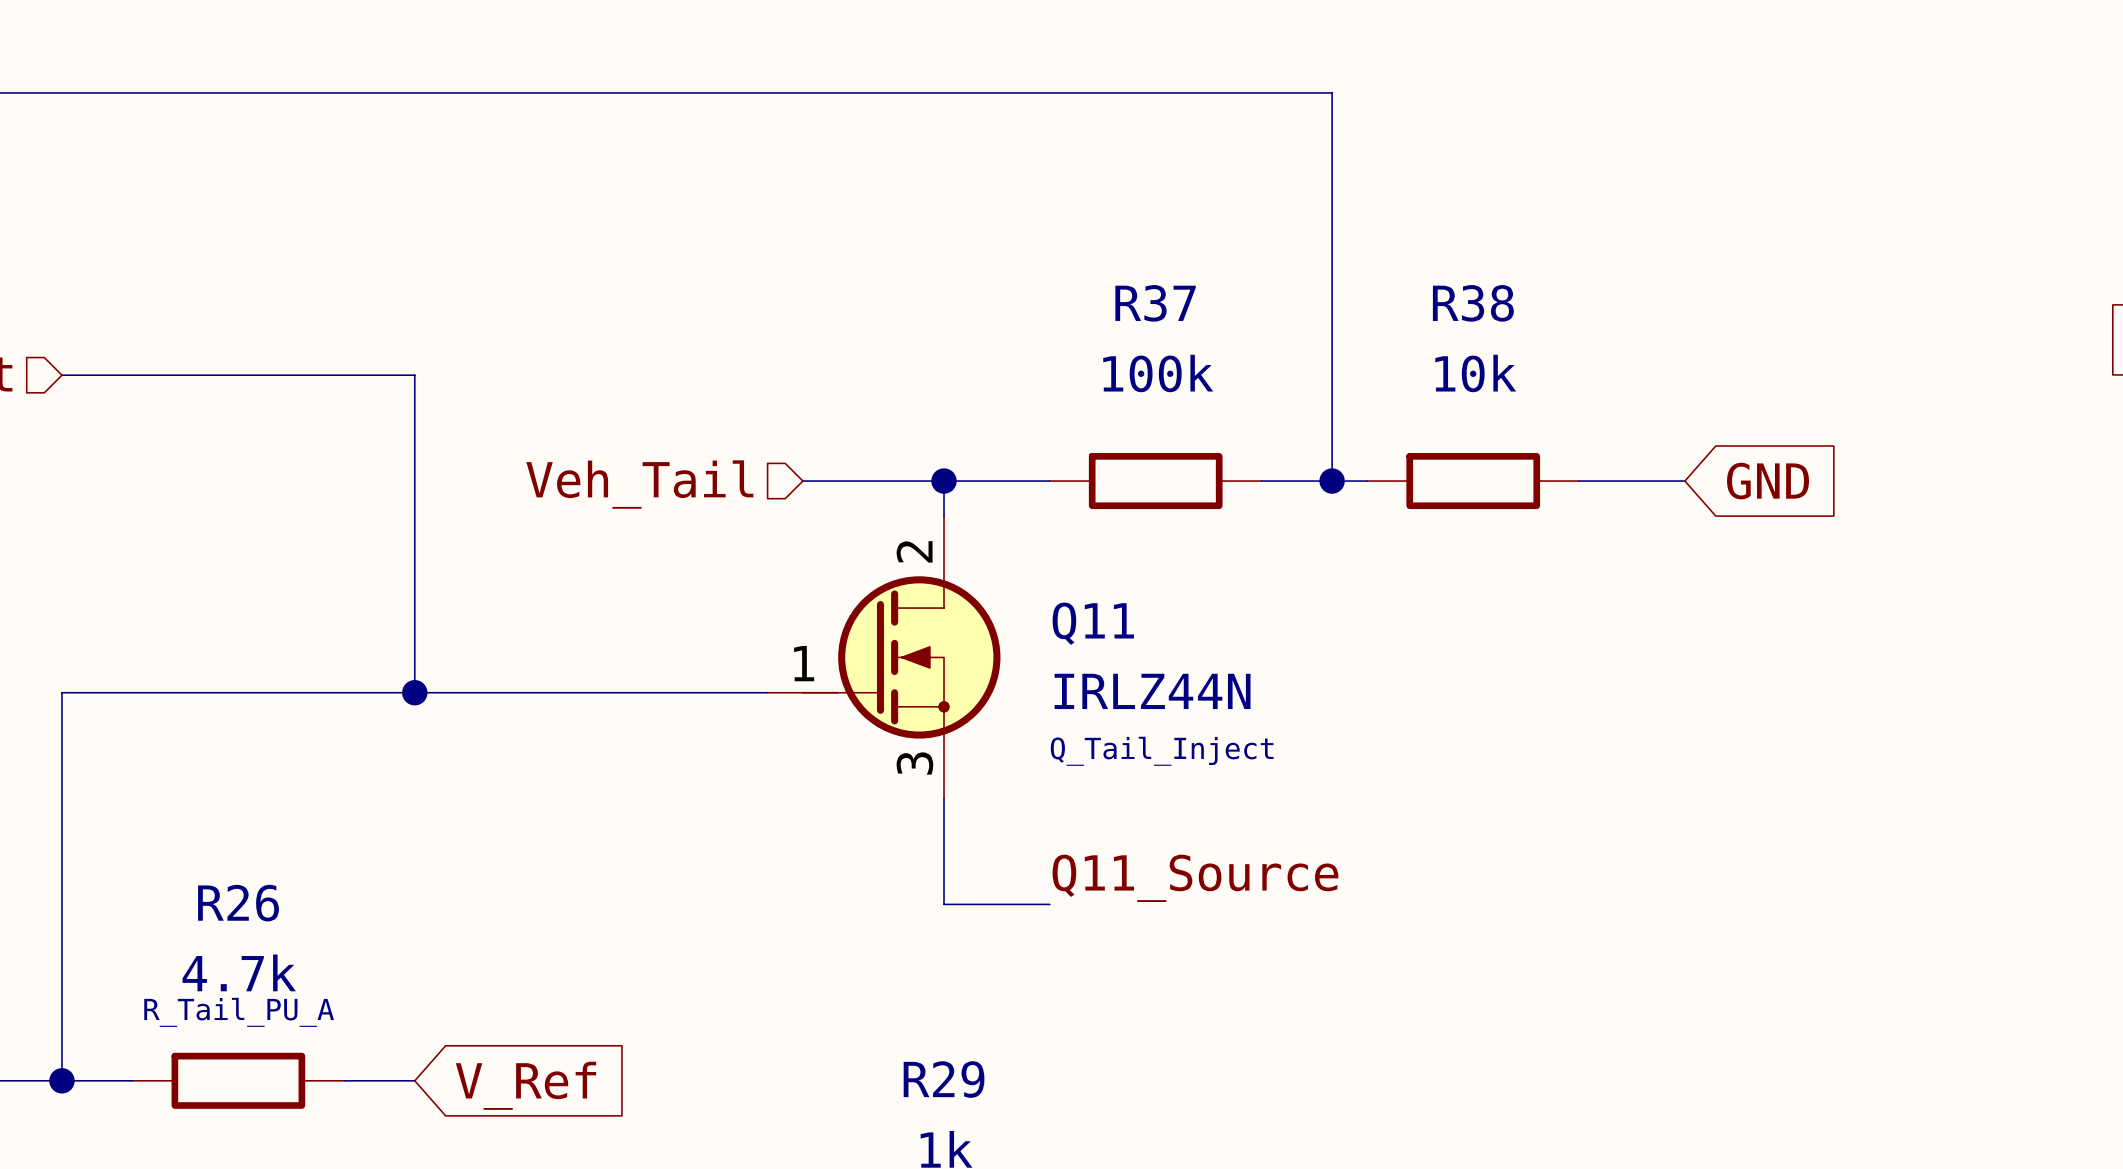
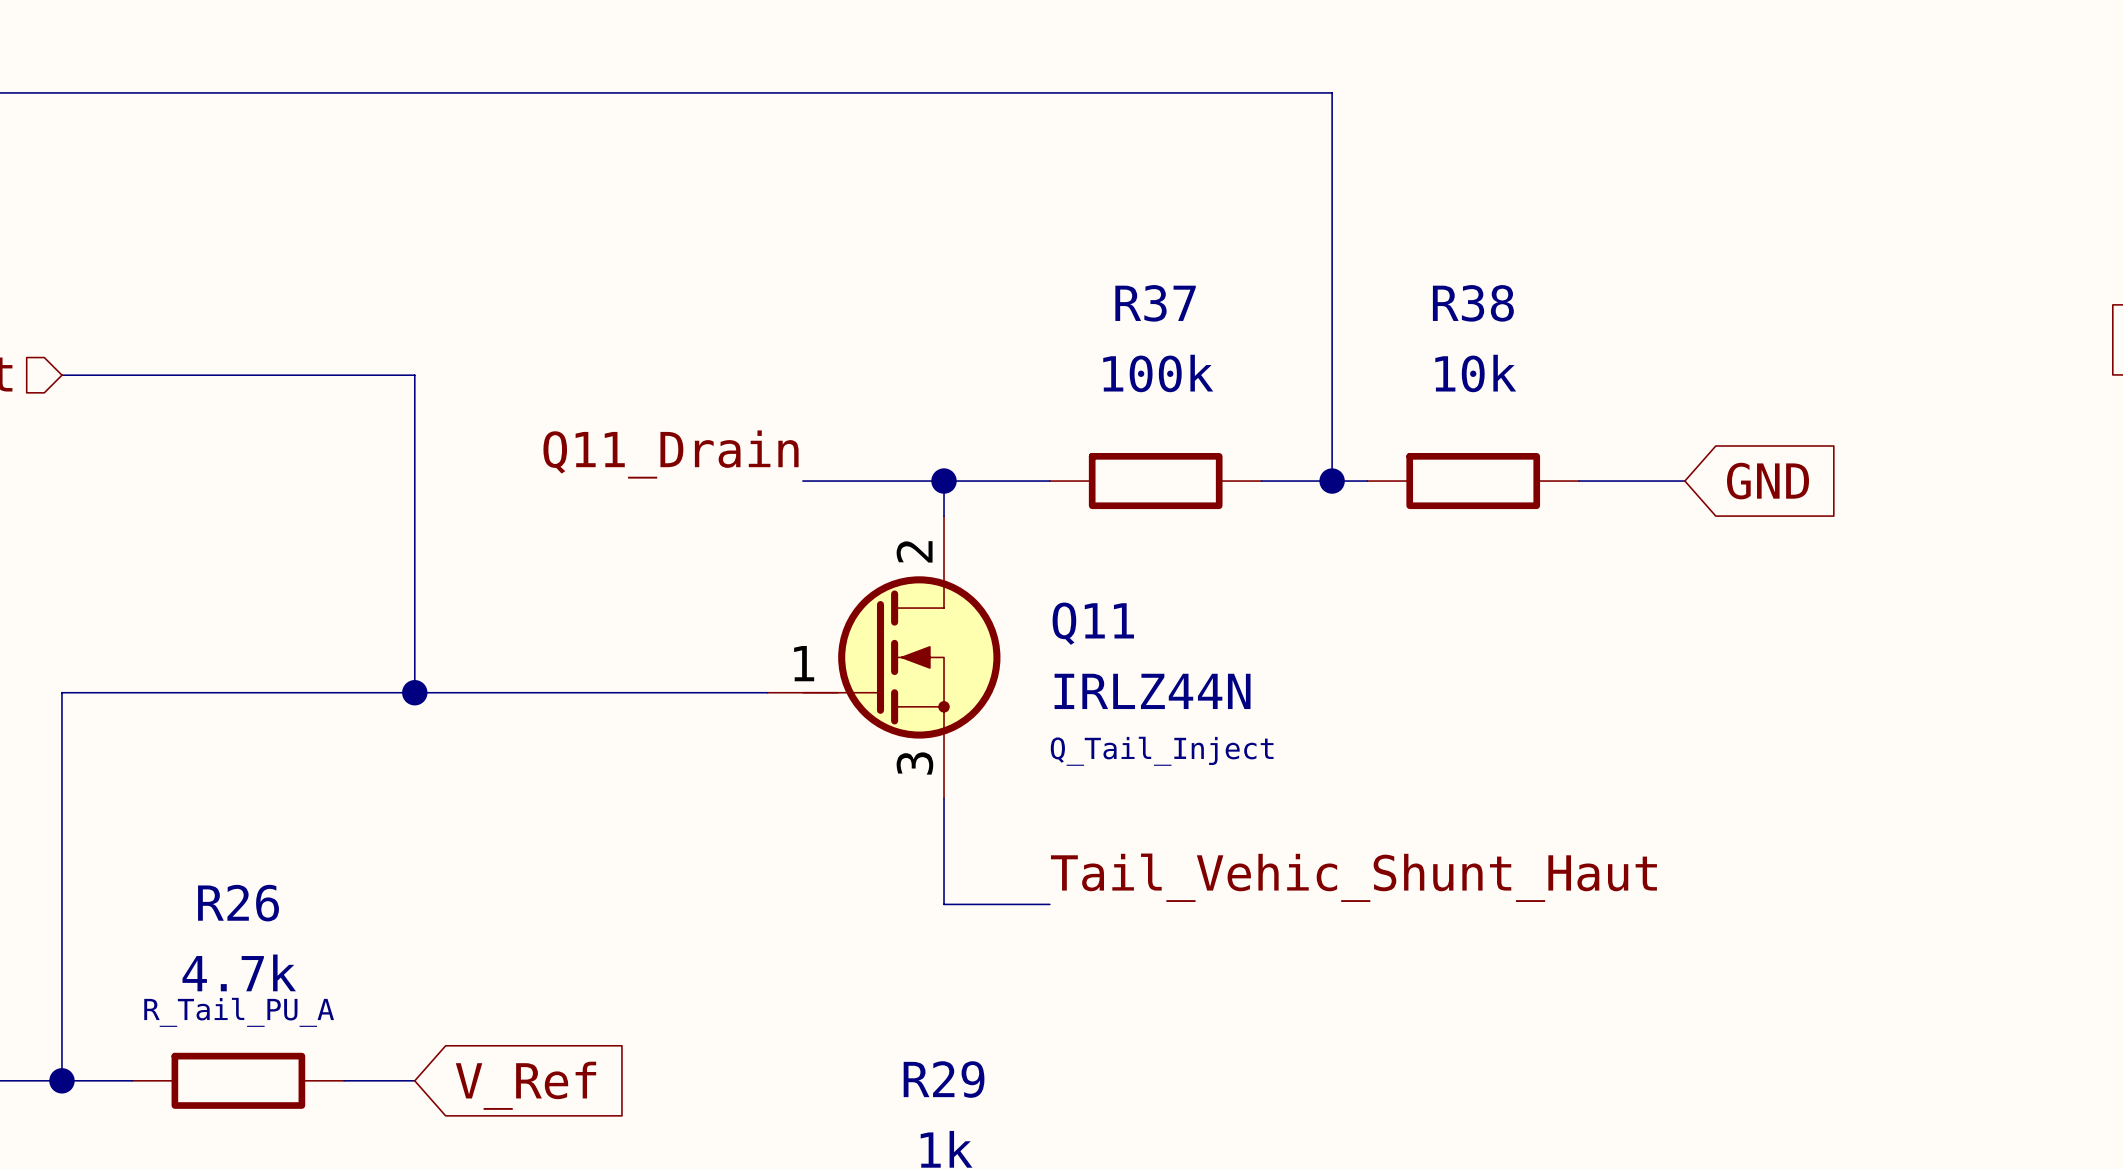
label: none -> Q11_Drain (671, 454)
hierarchical label: Veh_Tail (639, 484) -> none
label: Q11_Source (1195, 878) -> Tail_Vehic_Shunt_Haut (1353, 877)

